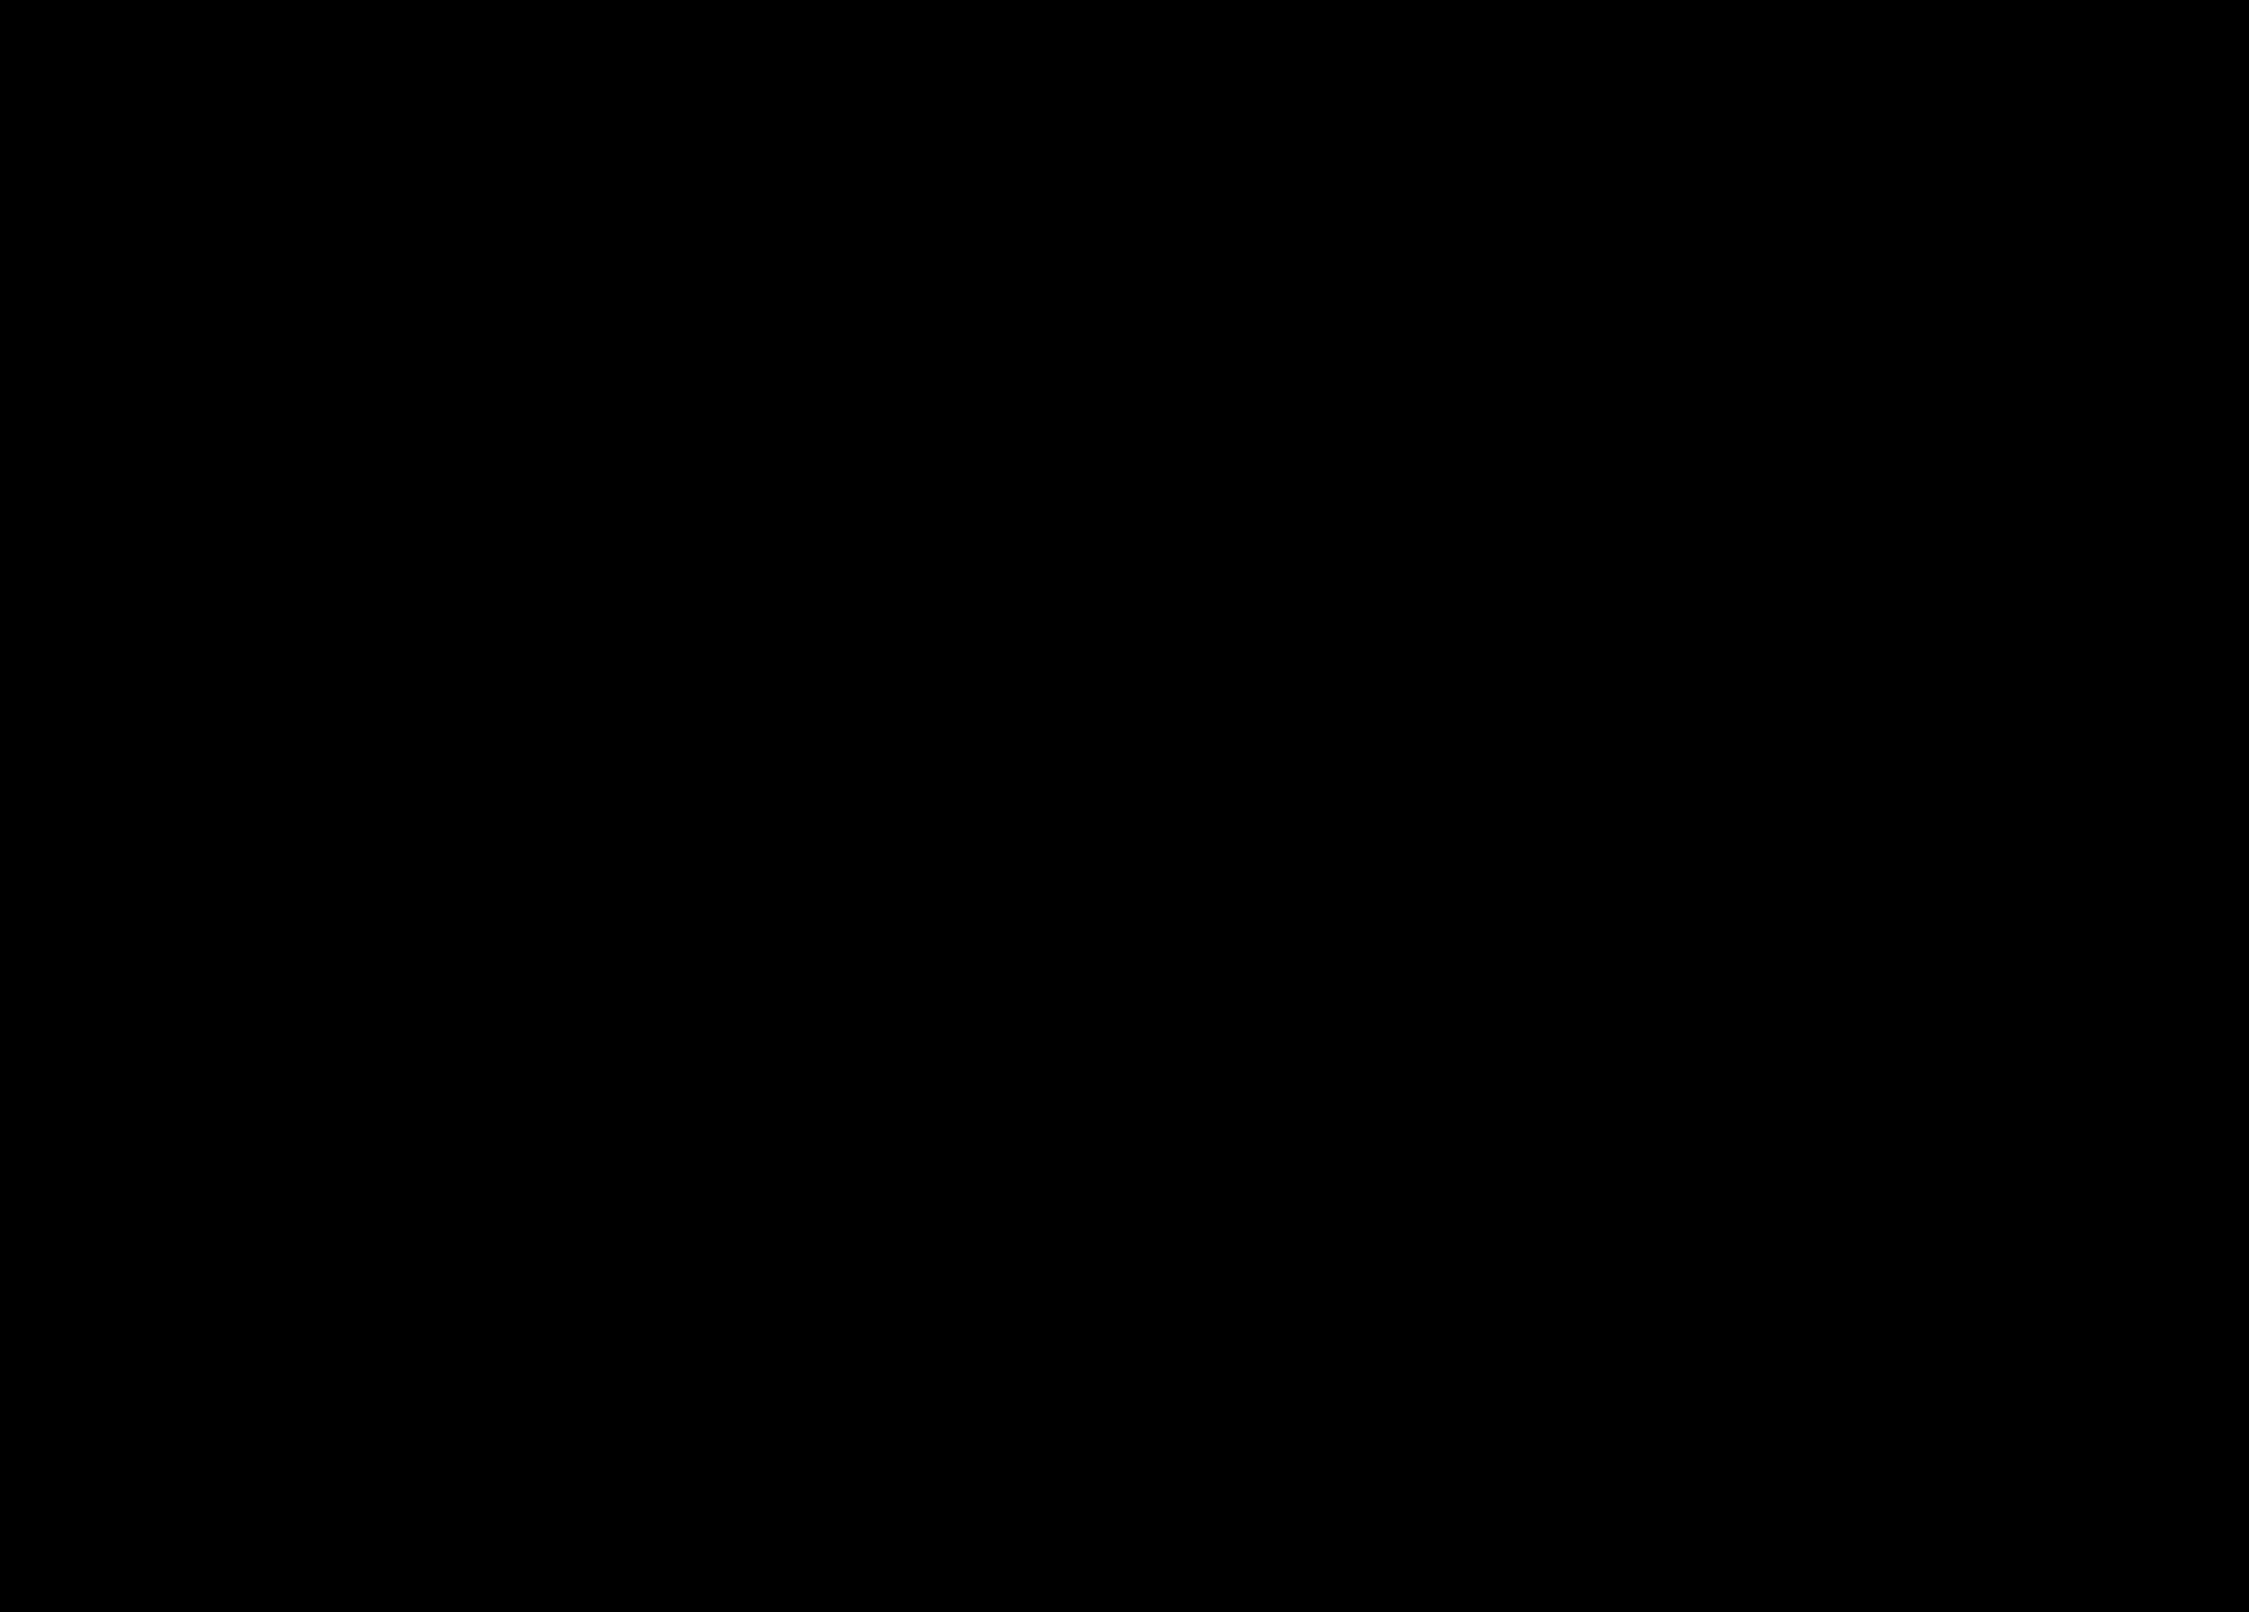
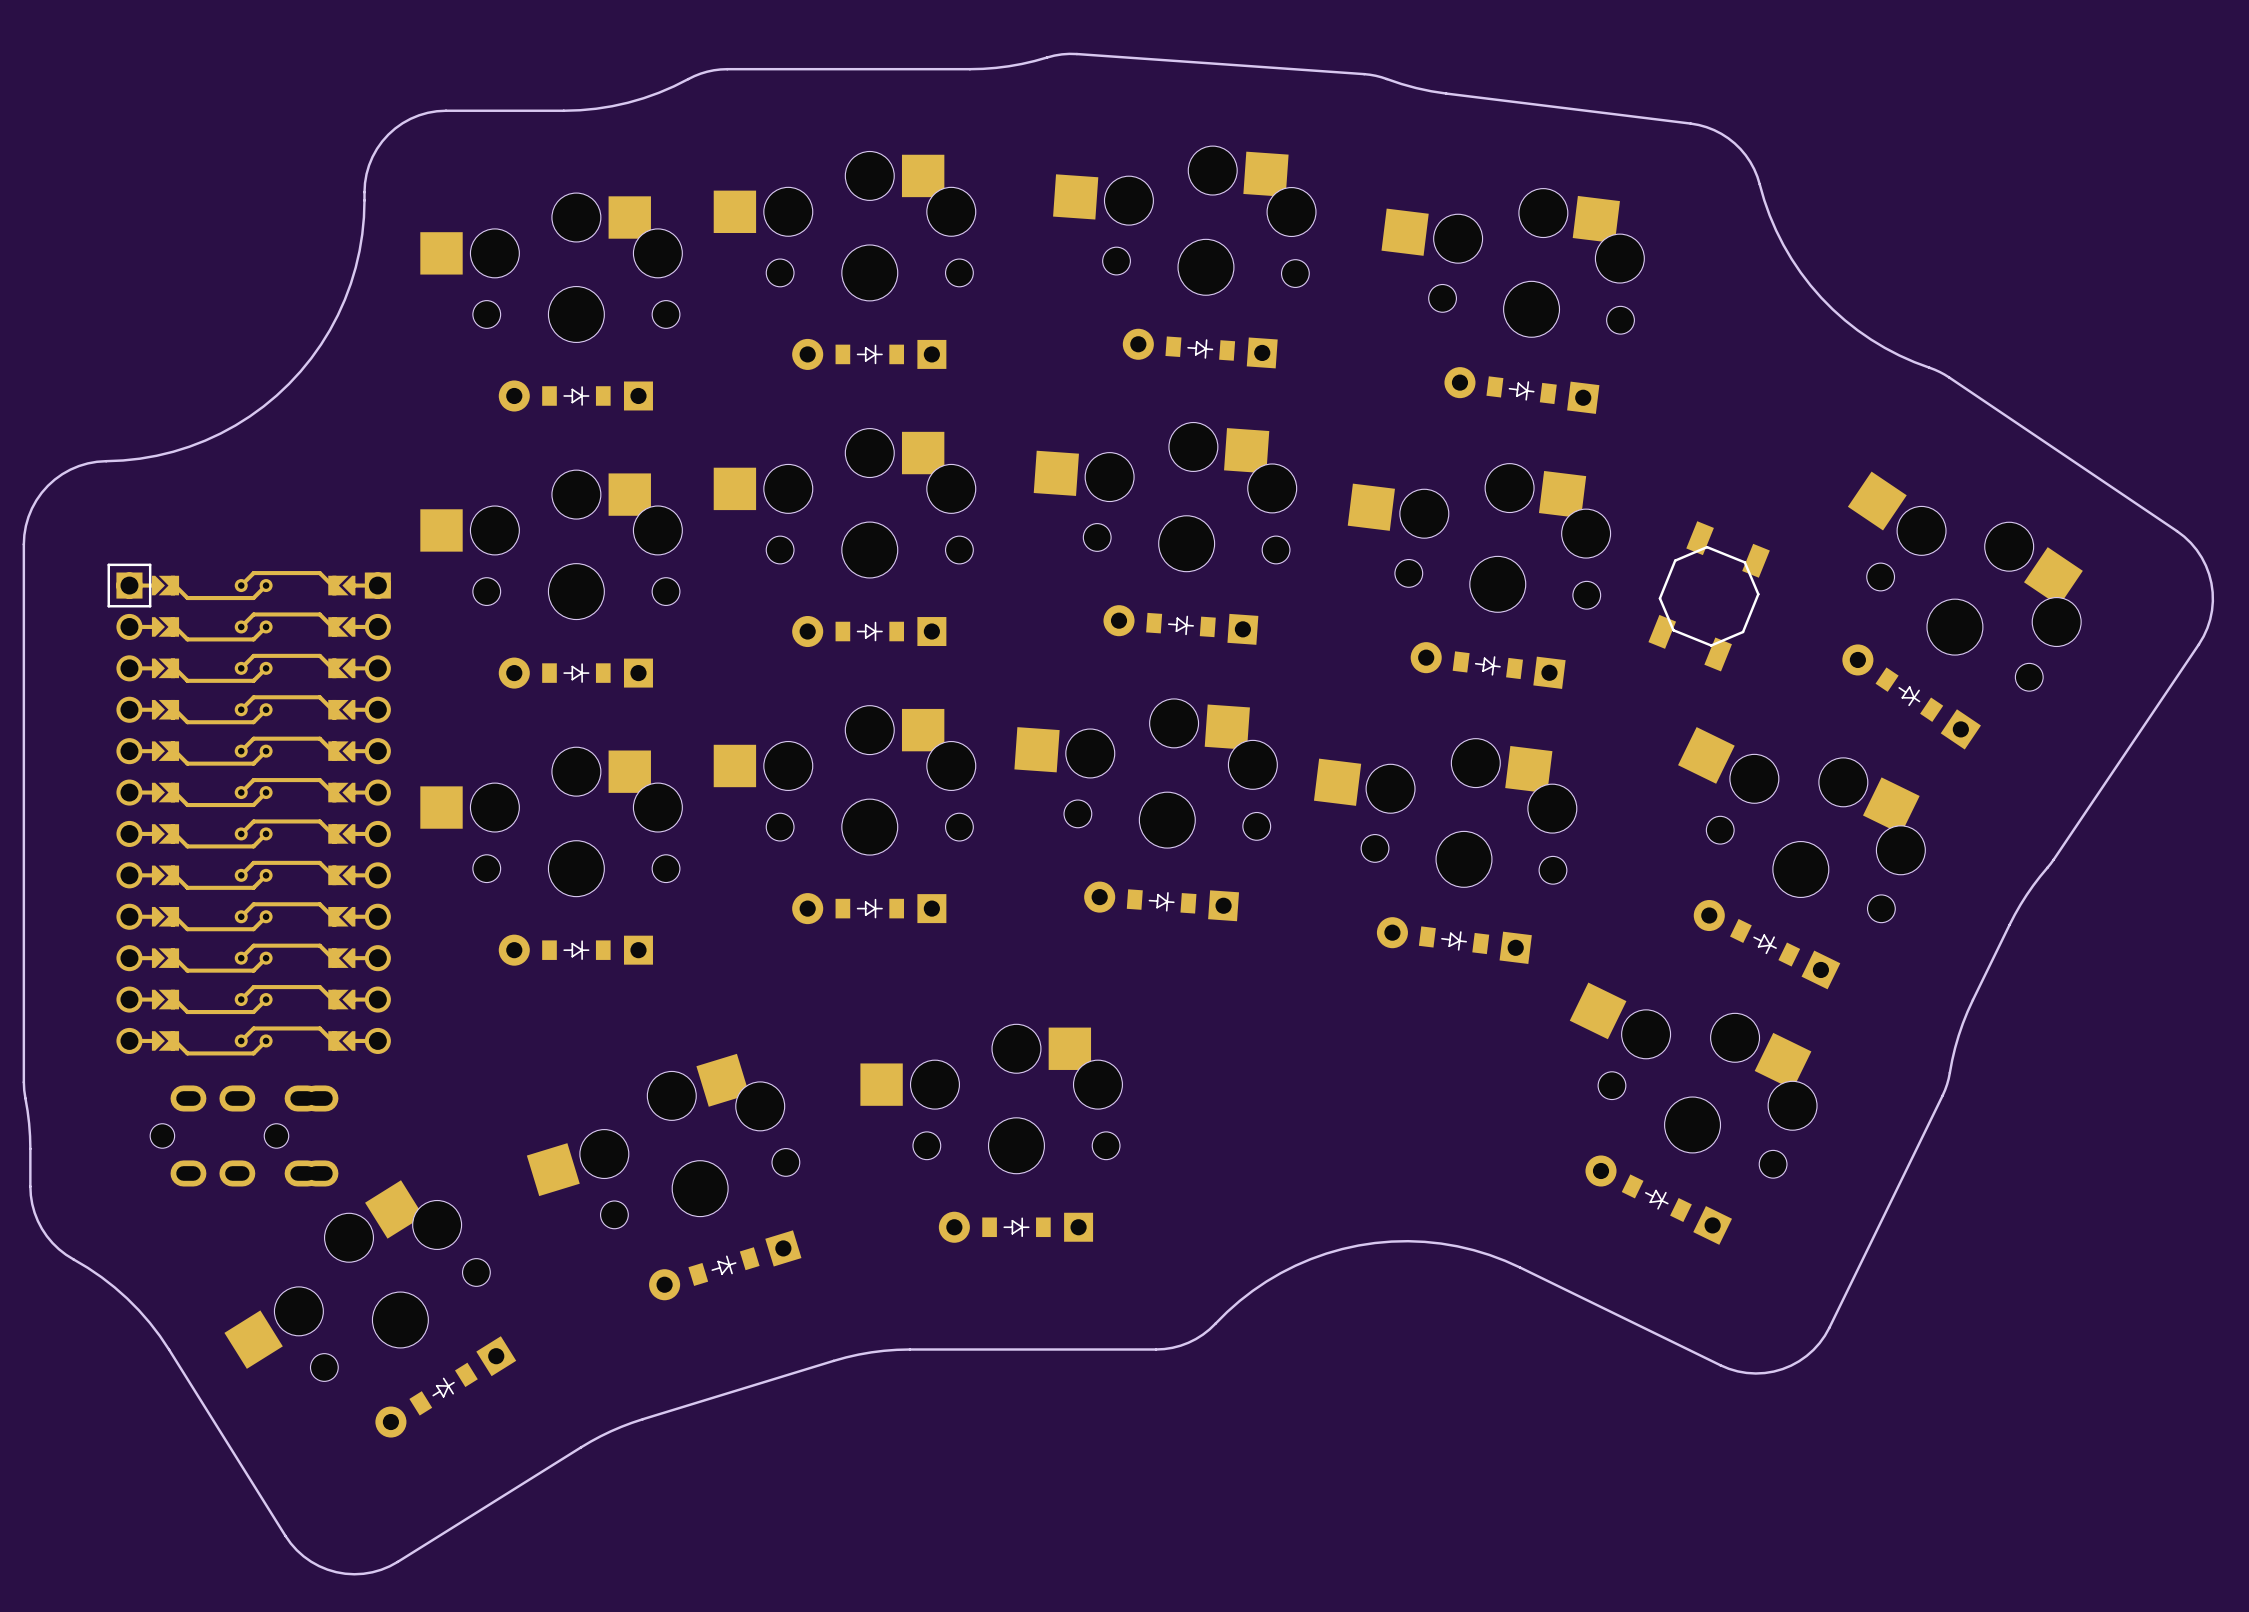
part: none -> (1184, 220)
part: none -> (844, 226)
part: none -> (1512, 262)
part: none -> (551, 267)
part: none -> (1200, 348)
part: none -> (869, 354)
part: none -> (1521, 390)
part: none -> (575, 395)
part: none -> (1165, 497)
part: none -> (844, 503)
part: none -> (1479, 537)
part: none -> (551, 544)
part: none -> (1965, 581)
part: none -> (1709, 596)
part: none -> (1180, 624)
part: none -> (869, 631)
part: none -> (1488, 665)
part: none -> (575, 673)
part: none -> (1911, 696)
part: none -> (1145, 773)
part: none -> (844, 780)
part: none -> (249, 809)
part: none -> (1445, 812)
part: none -> (551, 821)
part: none -> (1801, 824)
part: none -> (1161, 901)
part: none -> (869, 908)
board edge: none -> (2009, 924) (2026, 894) (2053, 859) (2203, 636) (2210, 619) (2212, 601) (2209, 574) (2196, 549) (2176, 531) (1949, 377) (1884, 347) (1857, 330) (1832, 309) (1800, 272) (1783, 244) (1769, 215) (1757, 176) (1750, 162) (1740, 149) (1721, 133) (1706, 127) (1690, 123) (1431, 91) (1369, 74) (1069, 53) (1008, 66) (982, 68) (720, 69) (700, 73) (643, 98) (596, 108) (563, 110) (446, 110) (427, 112) (410, 118) (395, 128) (382, 141) (372, 156) (365, 183) (363, 217) (359, 250) (350, 283) (329, 330) (311, 358) (288, 383) (249, 416) (205, 440) (156, 455) (96, 461) (70, 469) (54, 479) (41, 492) (31, 508) (25, 525) (23, 544) (23, 1082) (30, 1136) (32, 1204) (37, 1220) (52, 1243) (65, 1254) (101, 1277) (127, 1298) (149, 1322) (169, 1349)
board edge: none -> (2009, 924) (1972, 999)
part: none -> (1454, 940)
part: none -> (1767, 944)
part: none -> (575, 950)
board edge: none -> (1972, 1000) (1958, 1035) (1945, 1090) (1829, 1327) (1819, 1343) (1806, 1355) (1791, 1365) (1773, 1371) (1755, 1373) (1728, 1368) (1520, 1267) (1489, 1254) (1457, 1246) (1424, 1241) (1374, 1243) (1326, 1253) (1280, 1273) (1239, 1301) (1202, 1334) (1188, 1342) (1172, 1347) (1156, 1349) (909, 1349) (871, 1352) (833, 1360) (642, 1419) (590, 1441) (389, 1566) (372, 1572) (354, 1574) (336, 1572) (319, 1566) (303, 1556) (290, 1543) (169, 1349)
part: none -> (1693, 1080)
part: none -> (991, 1099)
part: none -> (244, 1135)
part: none -> (663, 1141)
part: none -> (1658, 1200)
part: none -> (1015, 1227)
part: none -> (725, 1265)
part: none -> (357, 1280)
part: none -> (445, 1386)

